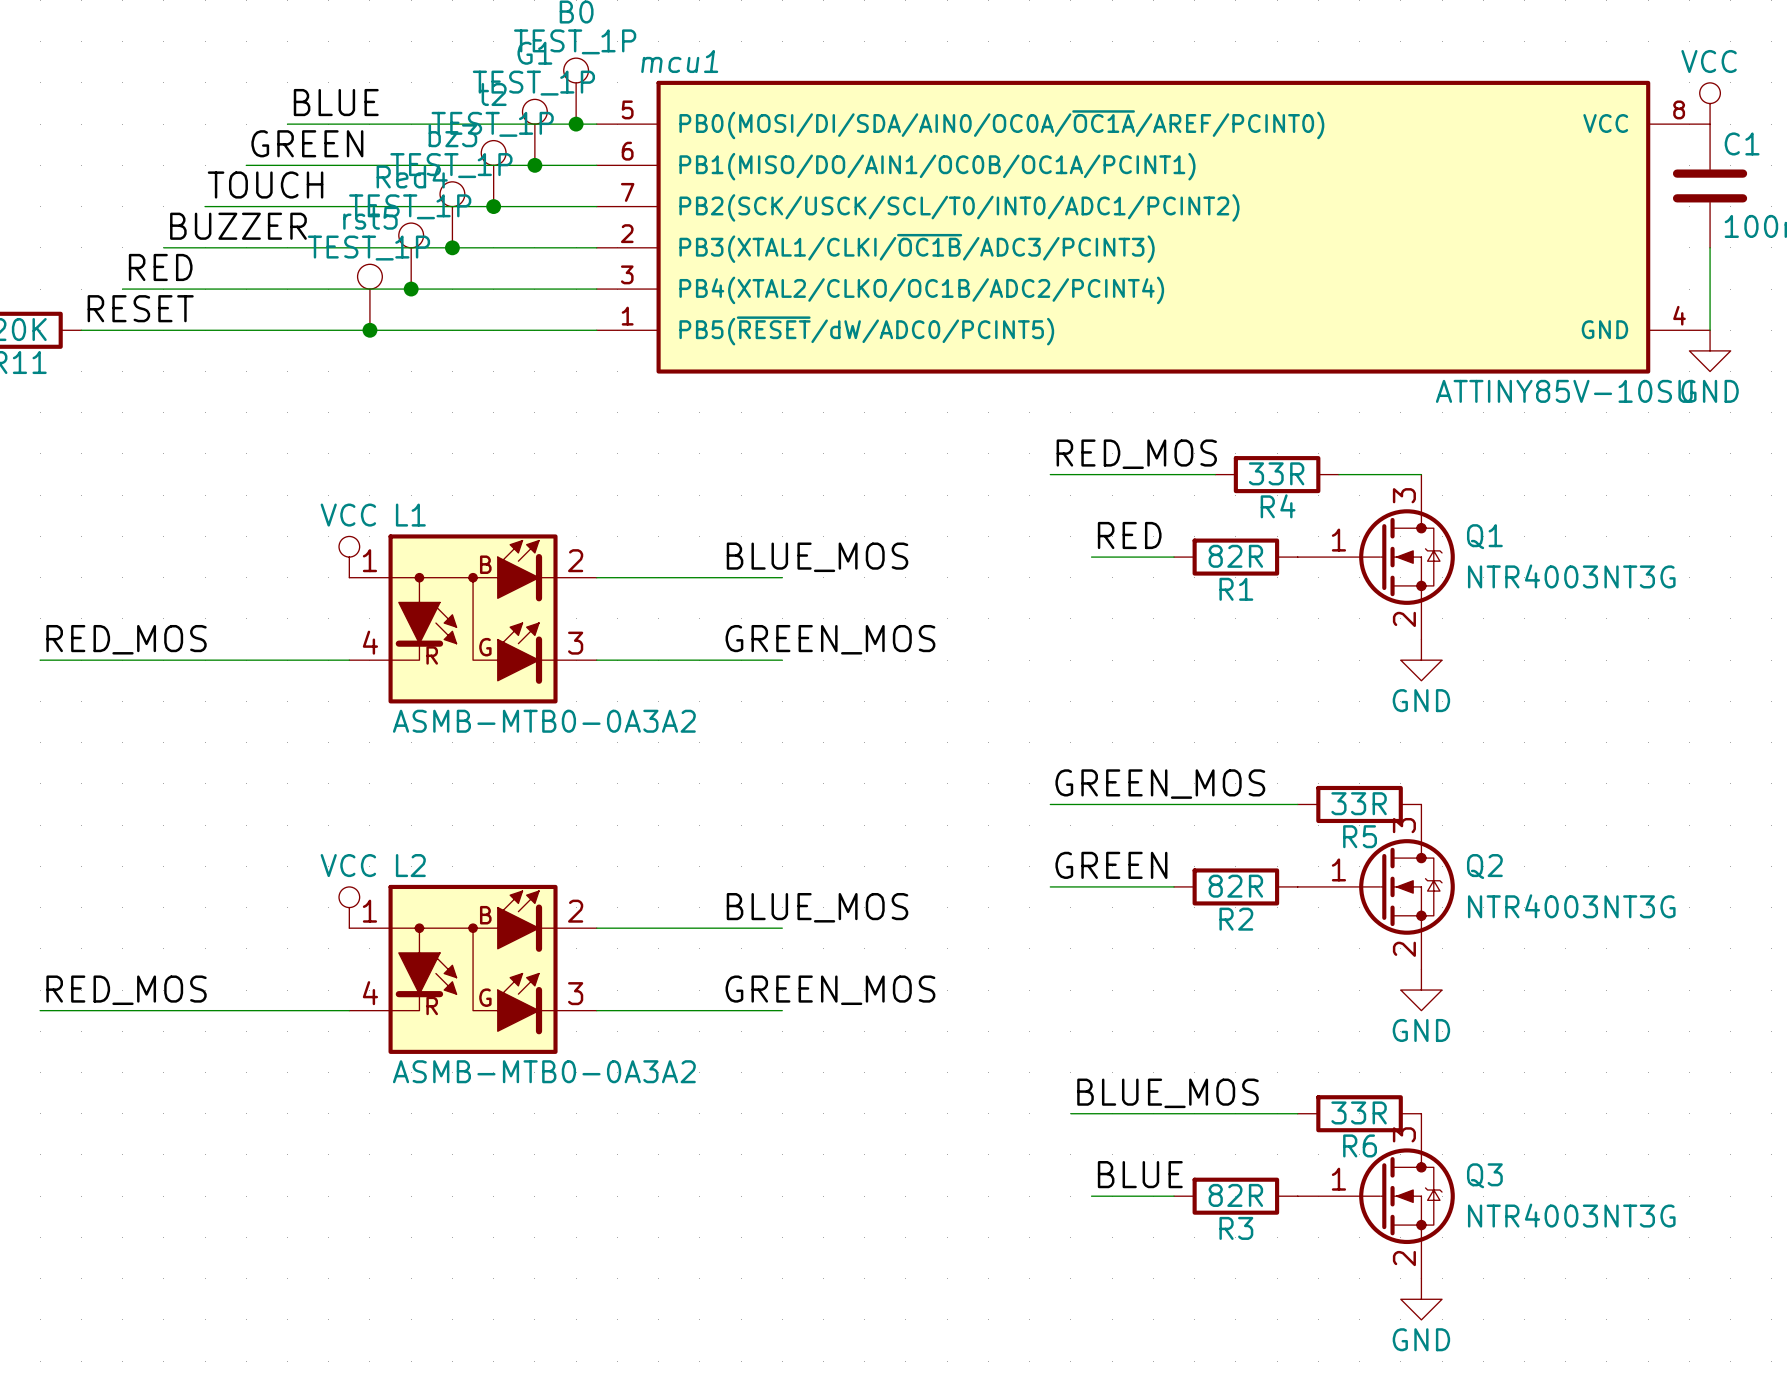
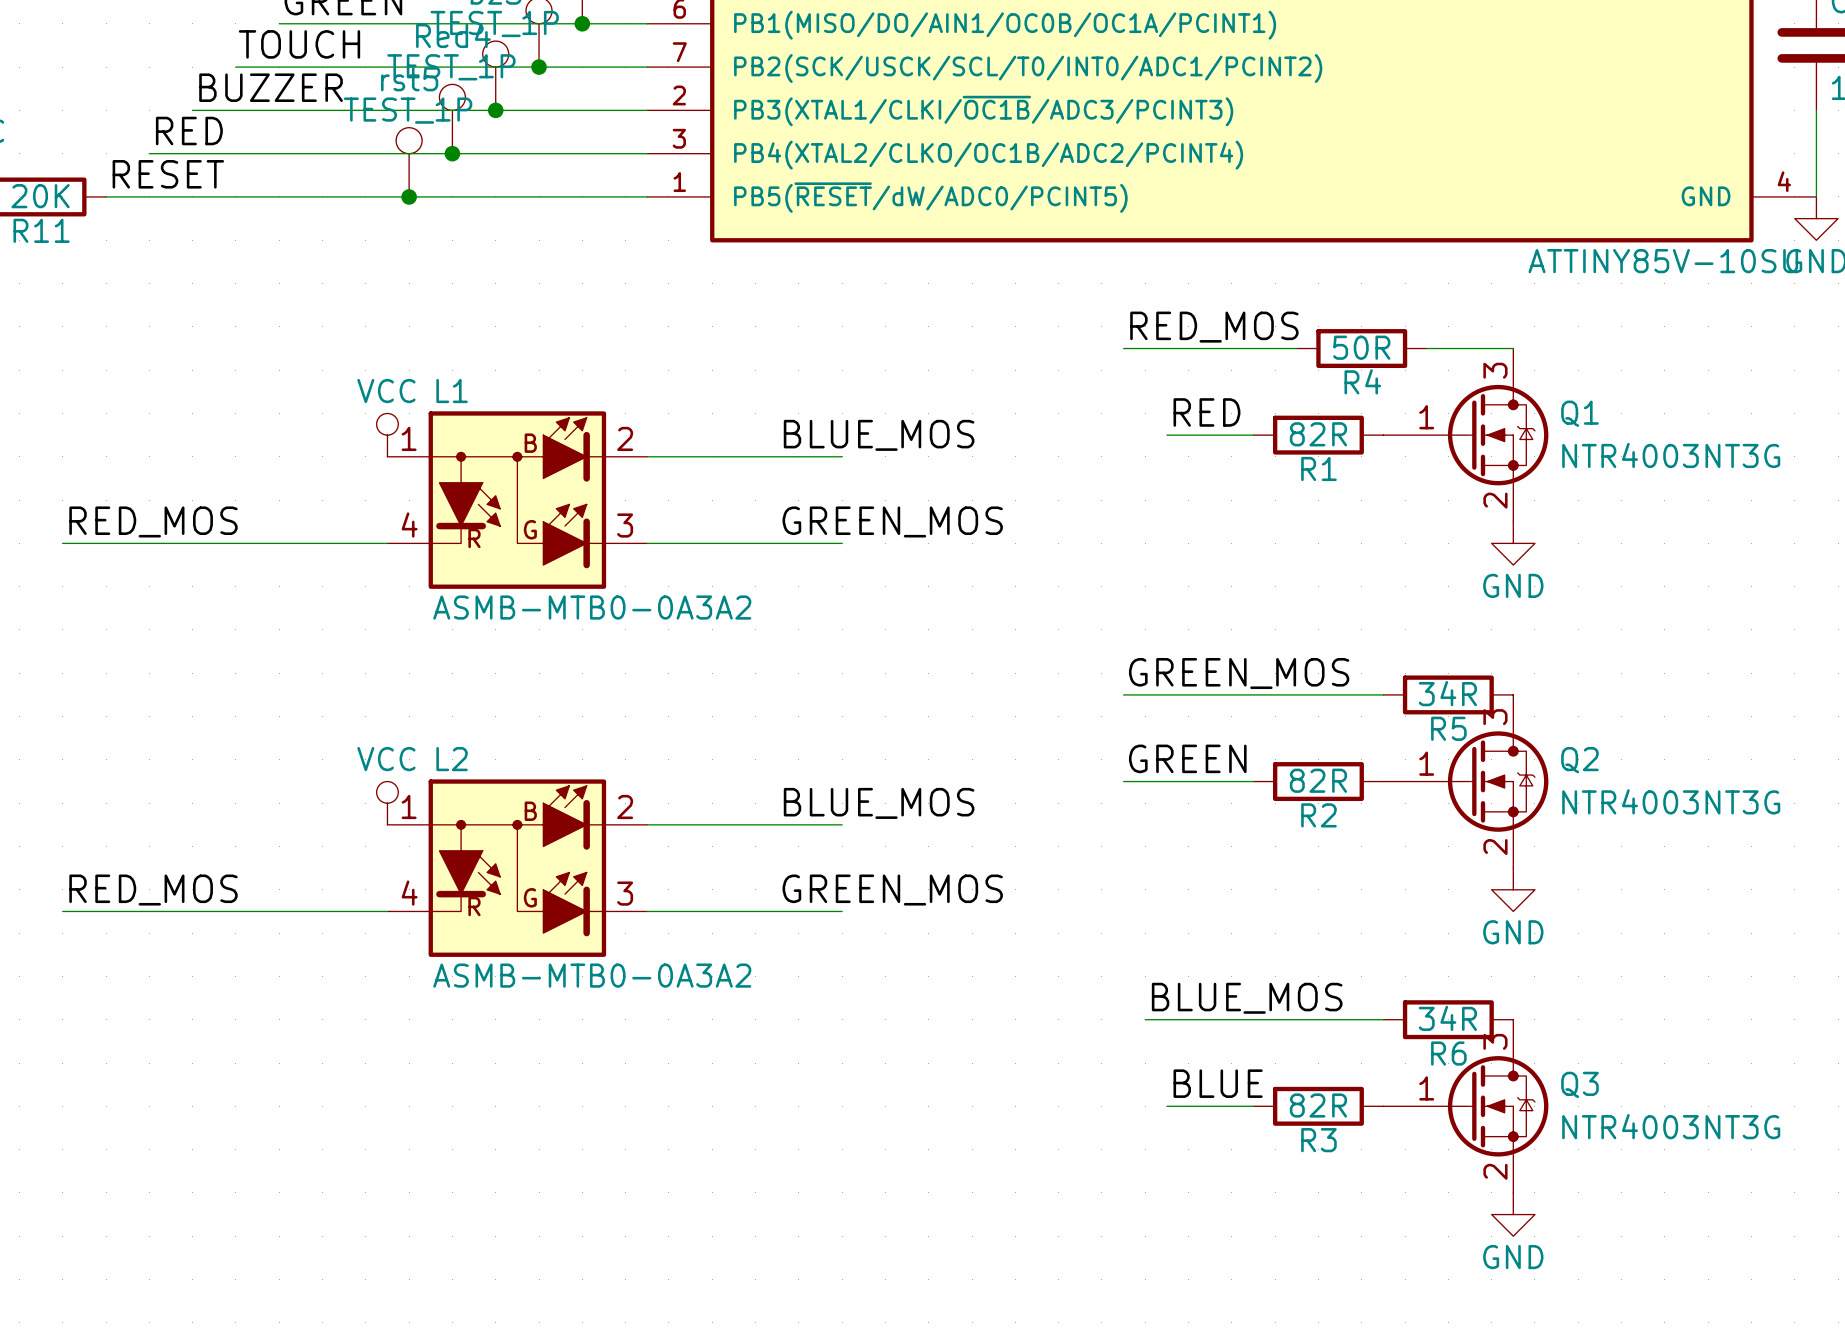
R4 value: 33R (1276, 473) -> 50R (1361, 347)
R5 value: 33R (1359, 803) -> 34R (1447, 693)
R6 value: 33R (1359, 1112) -> 34R (1447, 1018)

